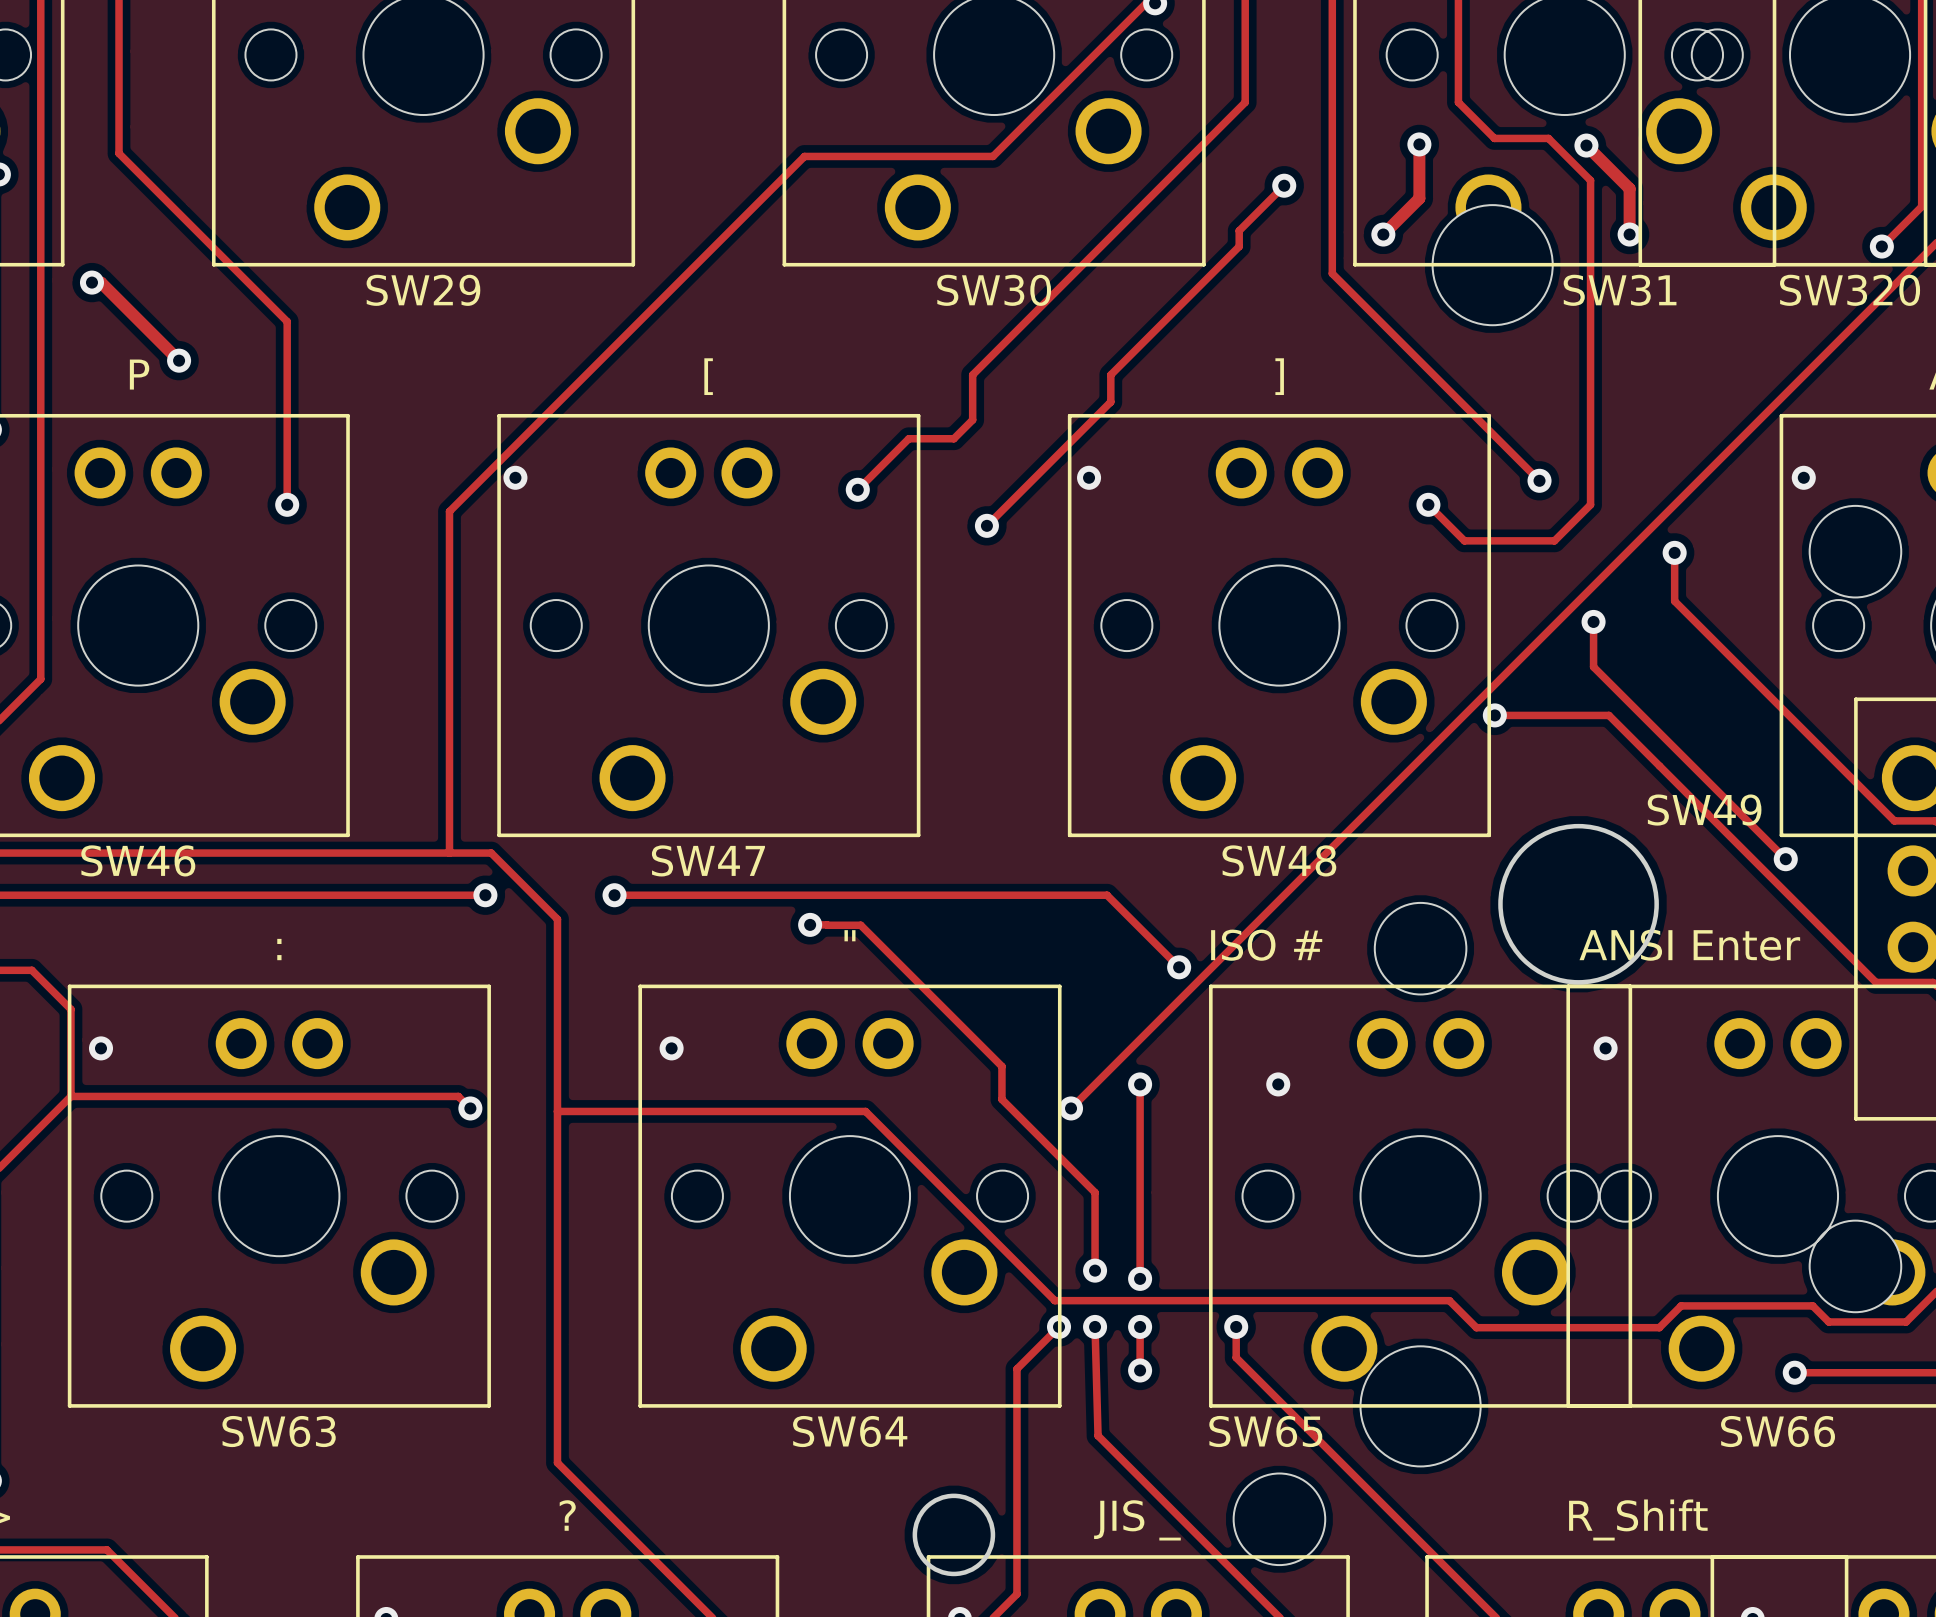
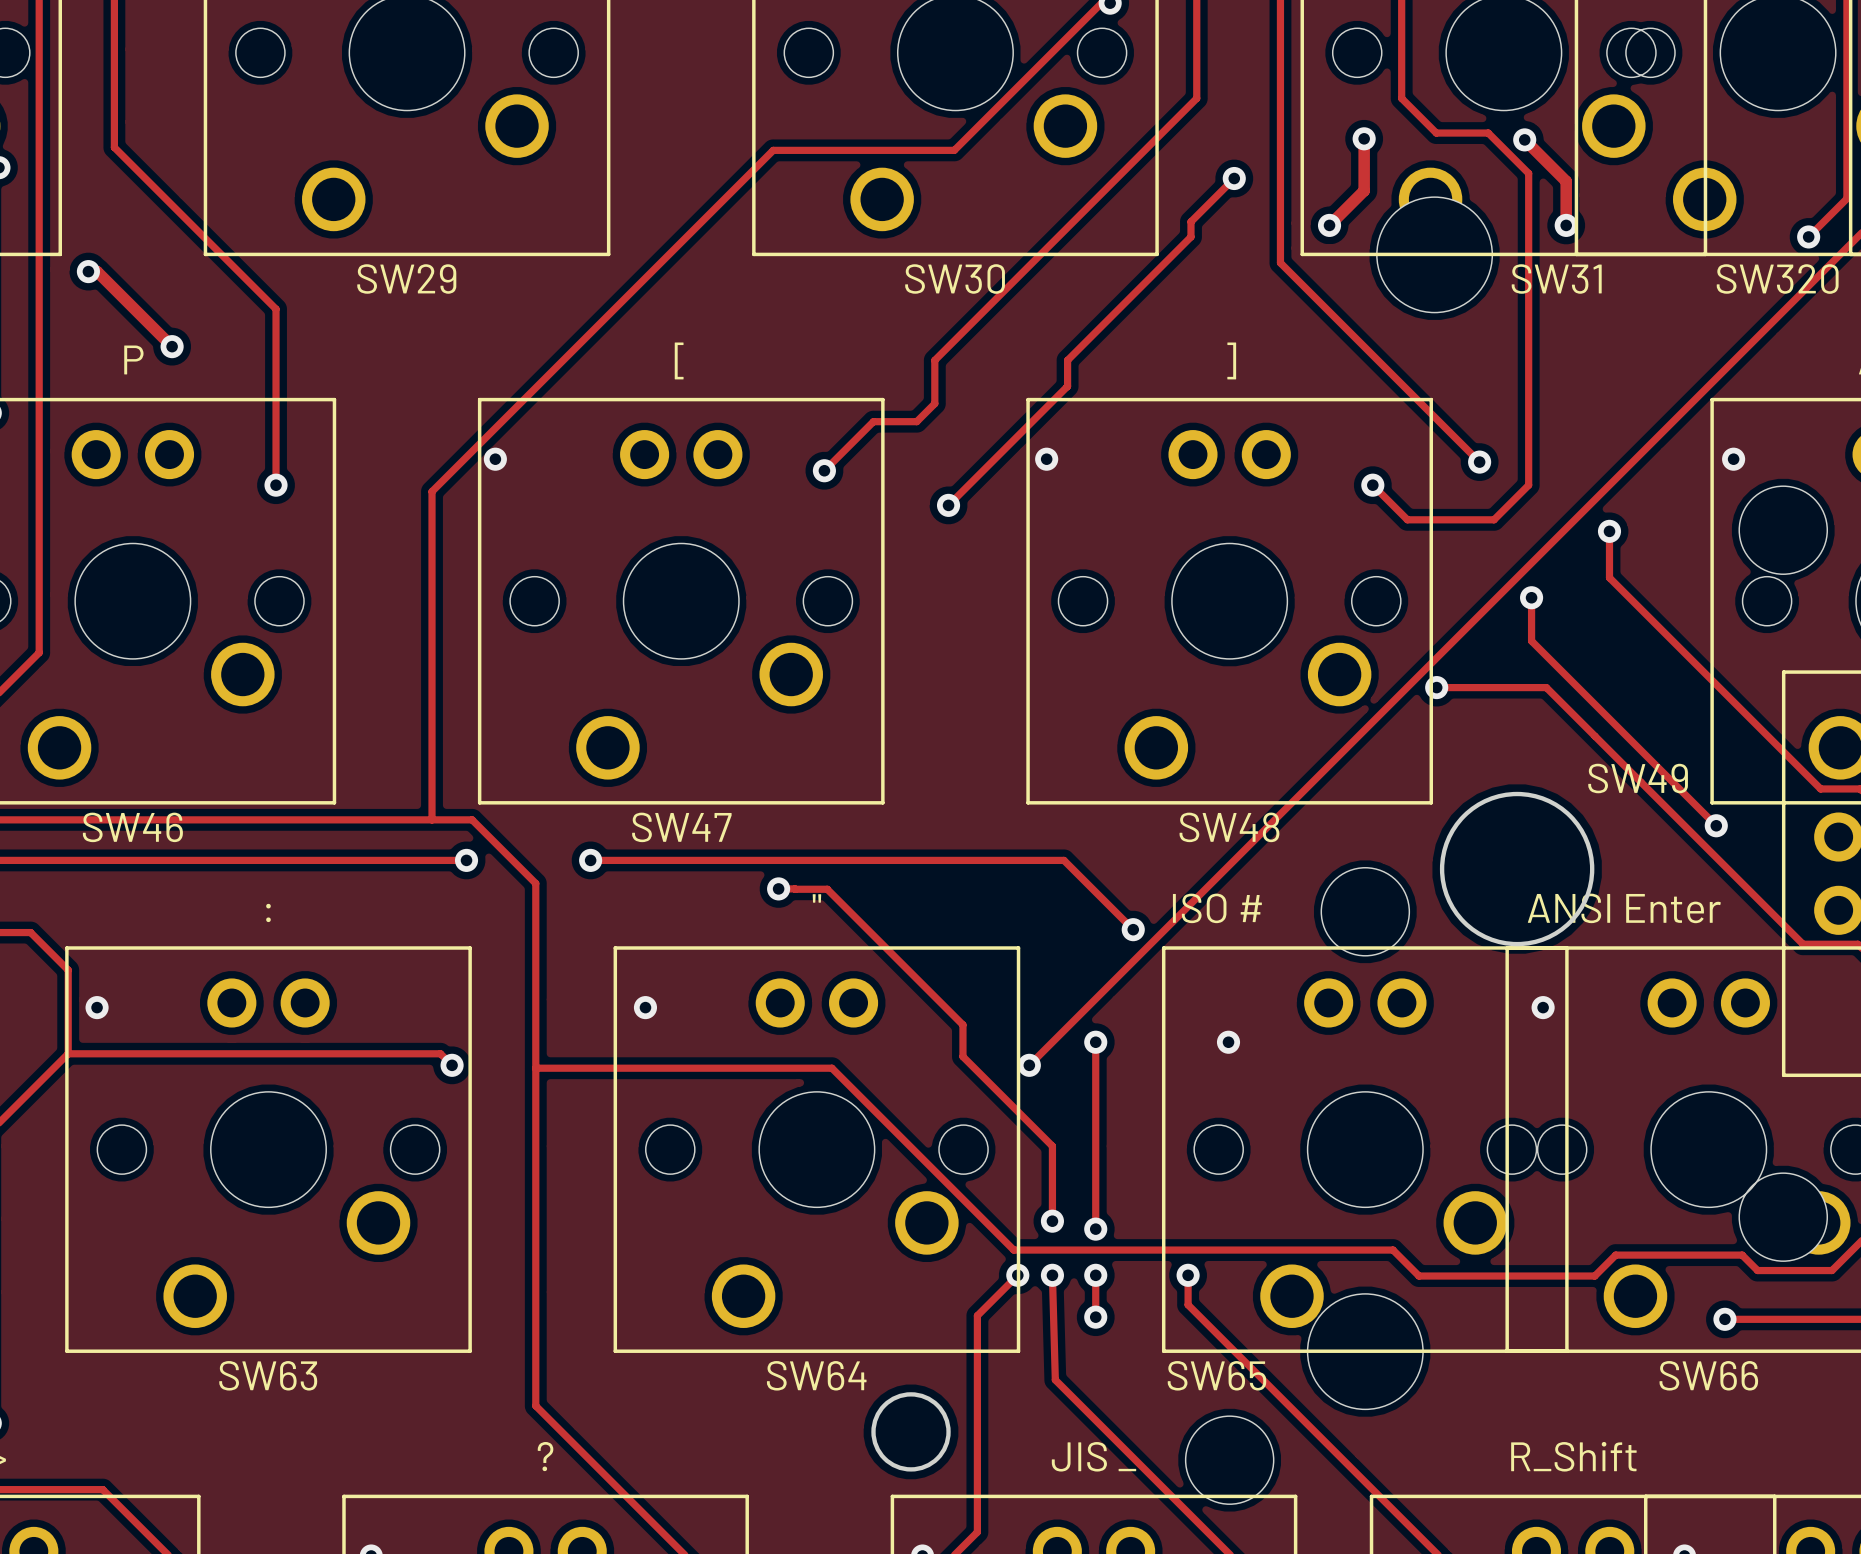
round board edge position: (953, 1534) -> (911, 1431)

